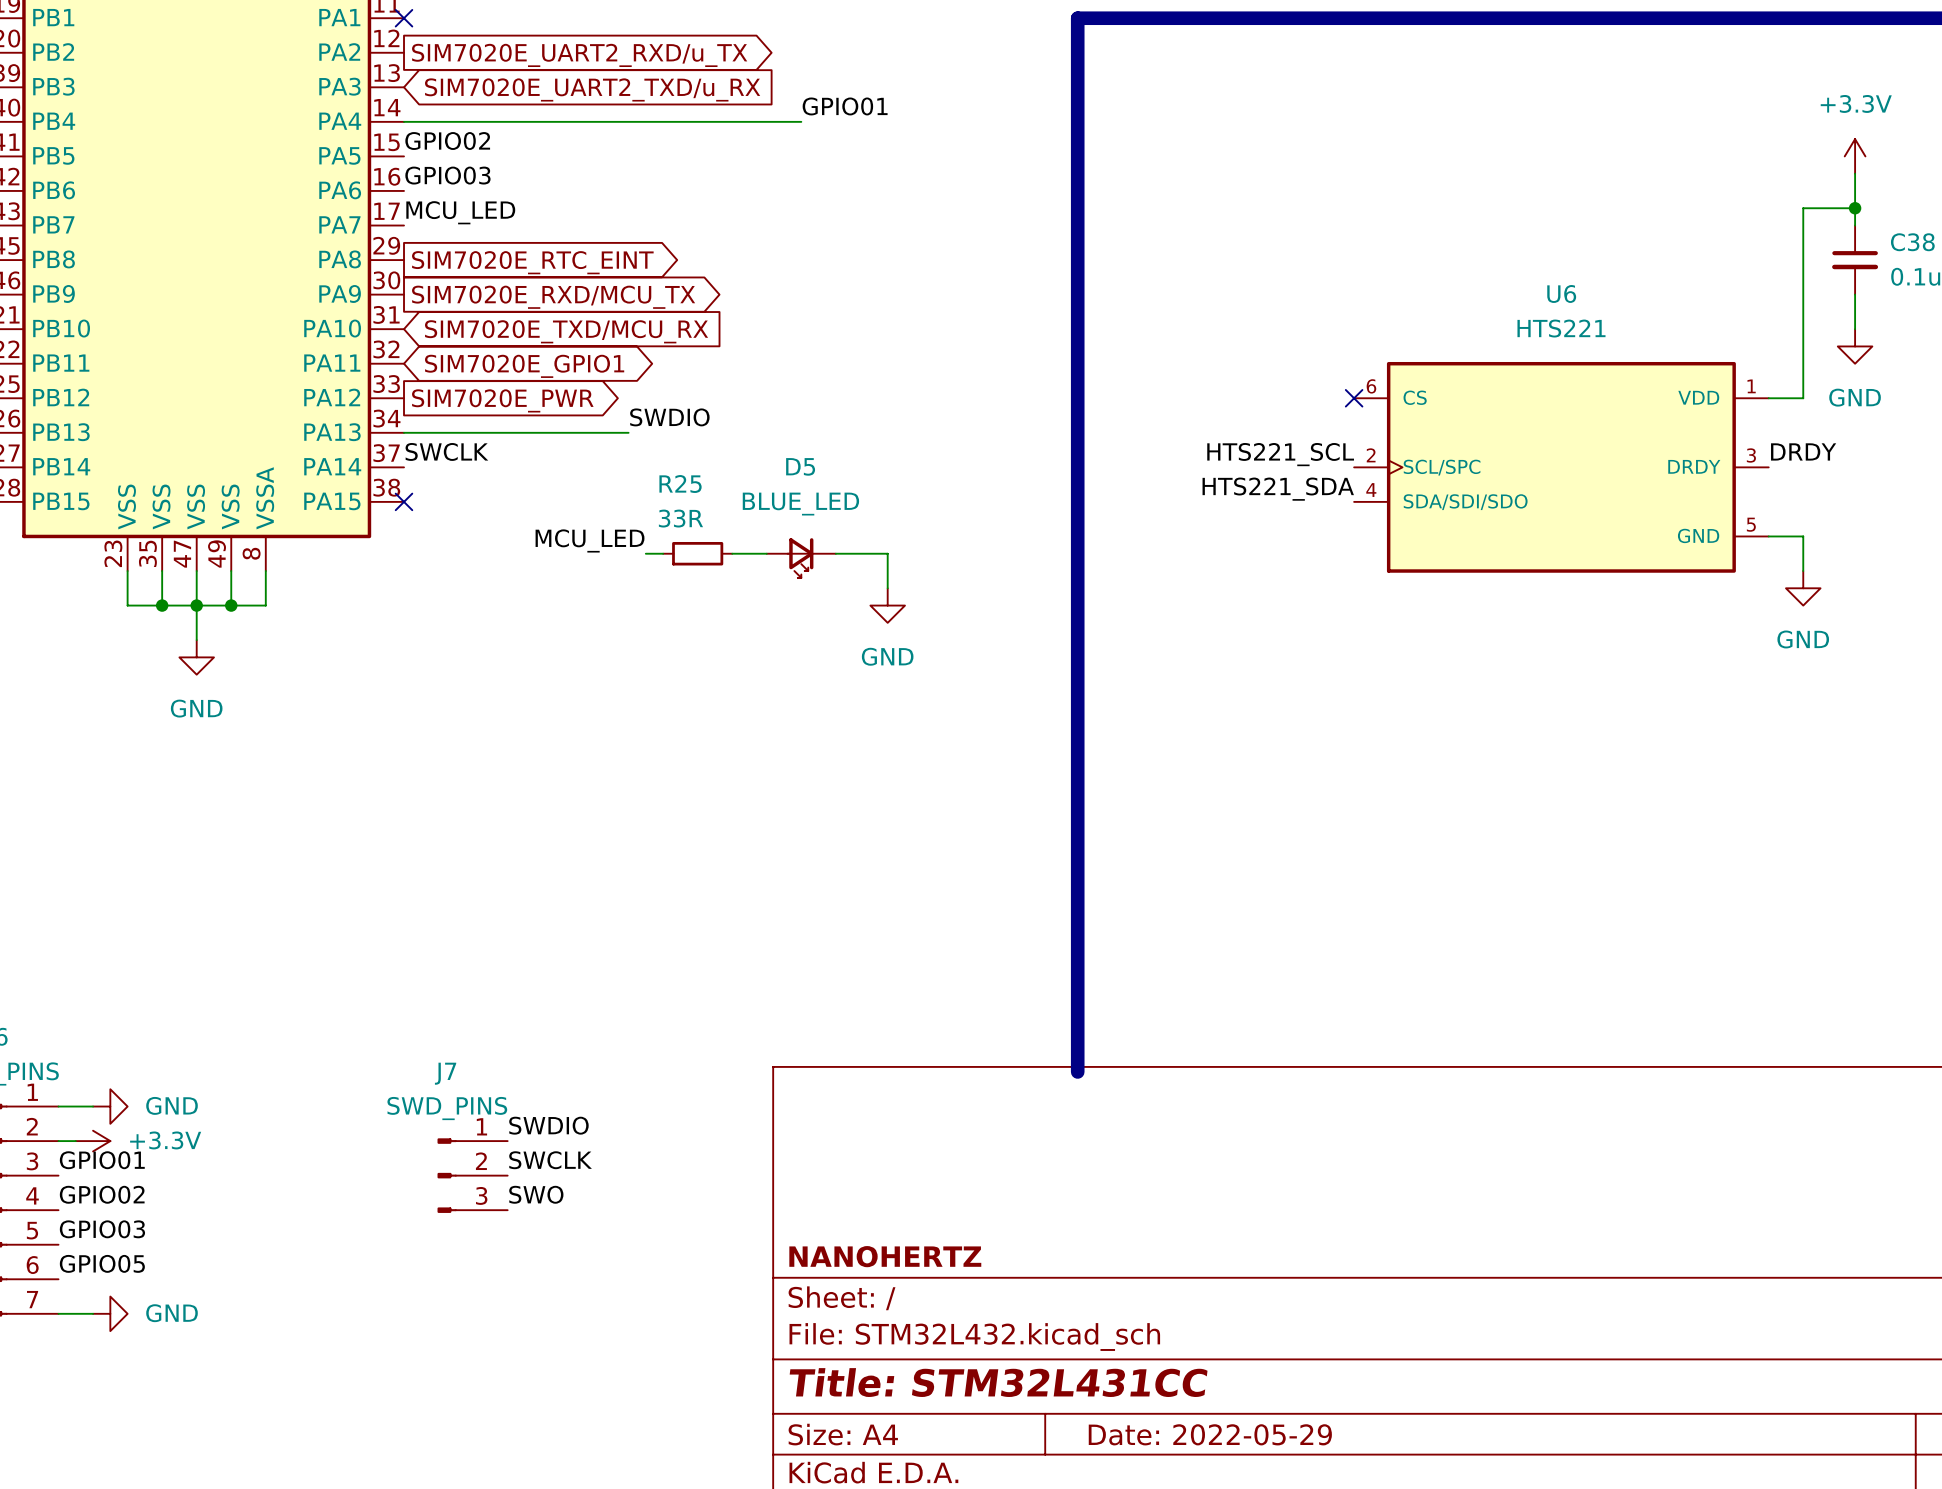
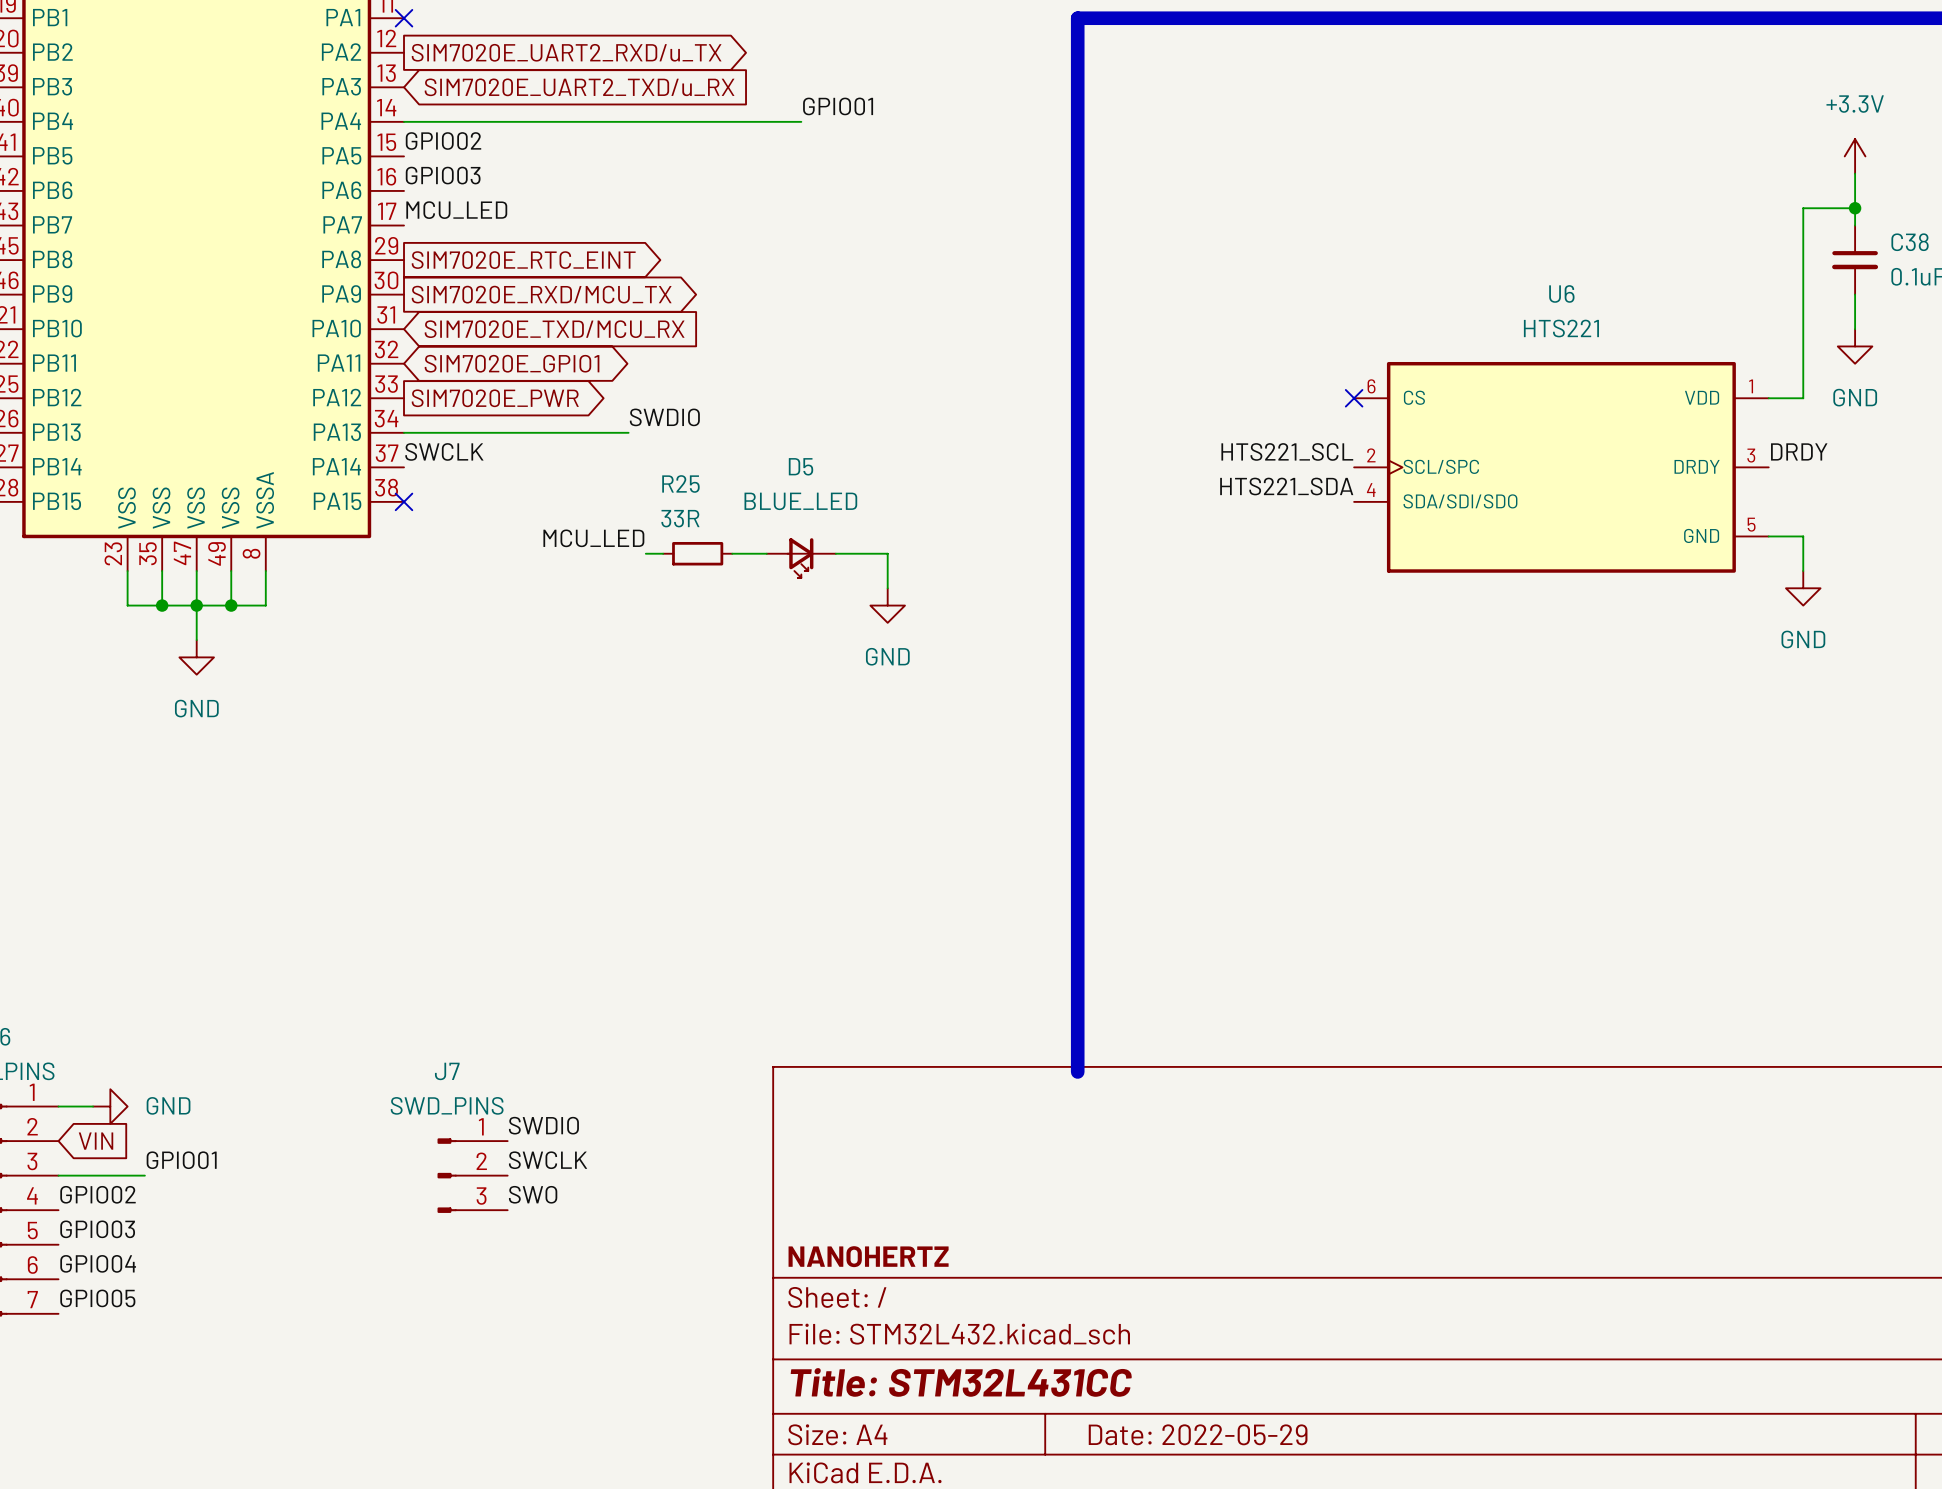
wire: (58, 1141) (75, 1141) -> none
power symbol: +3.3V (93, 1141) -> none
global label: none -> VIN (96, 1141)
label position: GPIO01 (102, 1160) -> GPIO01 (181, 1160)
wire: none -> (58, 1175) (144, 1175)
label: GPIO05 (102, 1263) -> GPIO04 (98, 1263)
label: none -> GPIO05 (97, 1298)
wire: (58, 1313) (93, 1313) -> none
power symbol: GND (110, 1313) -> none

